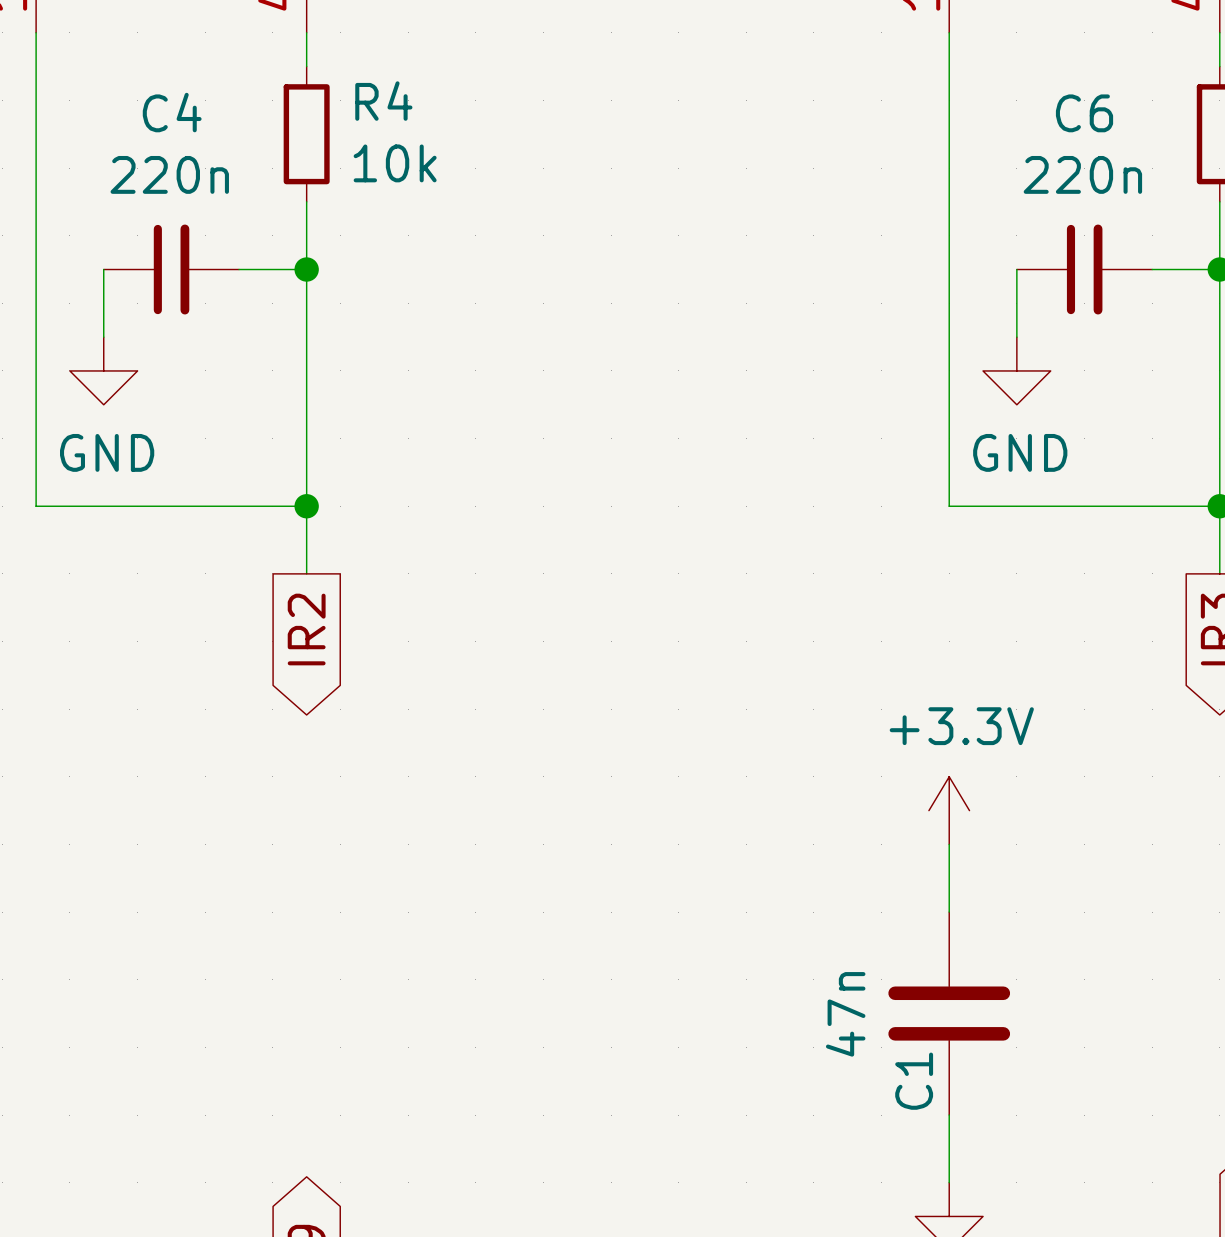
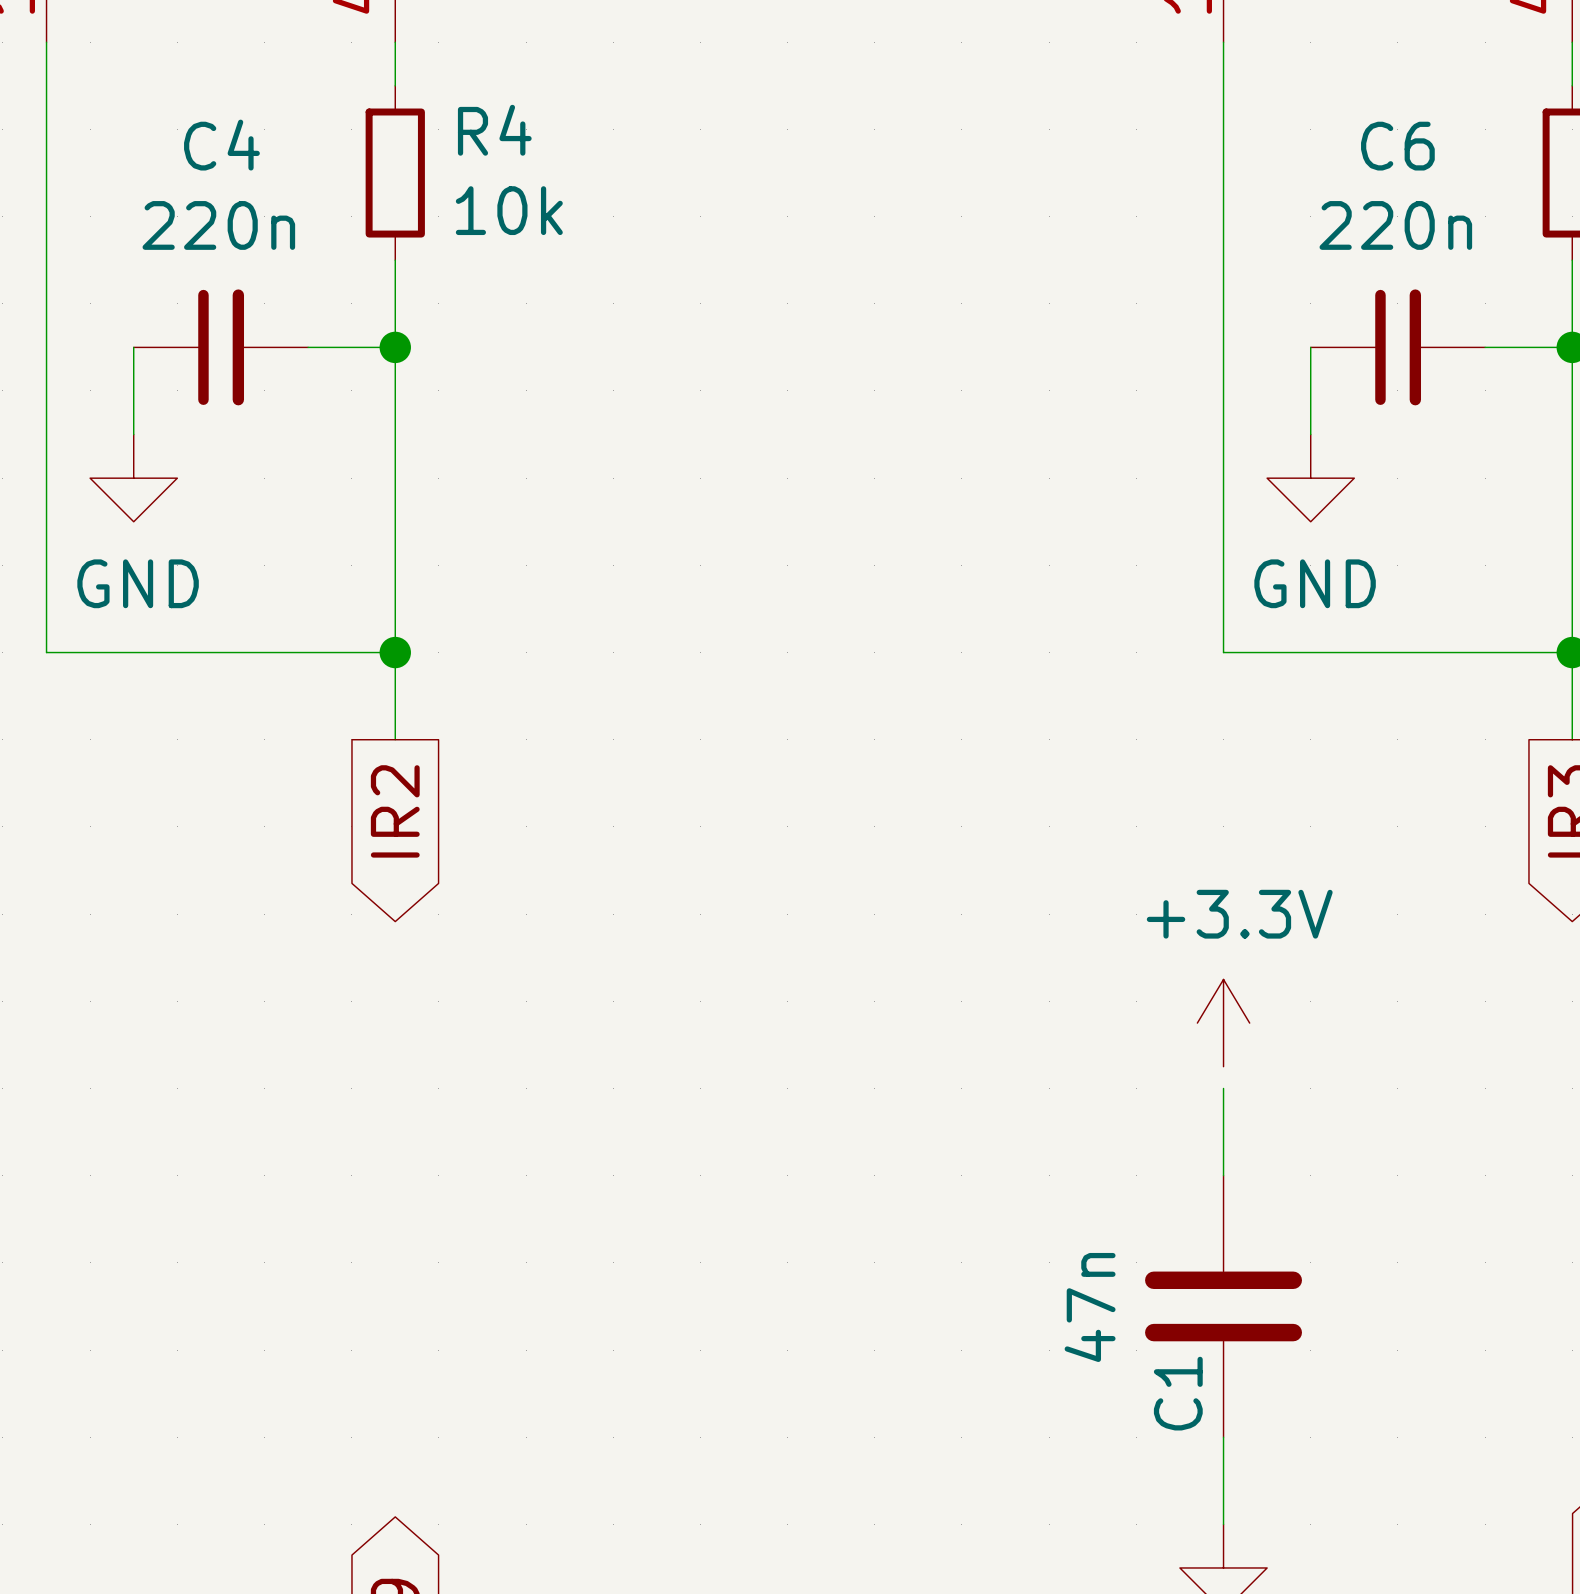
power symbol position: +3.3V (949, 810) -> +3.3V (1223, 1023)

